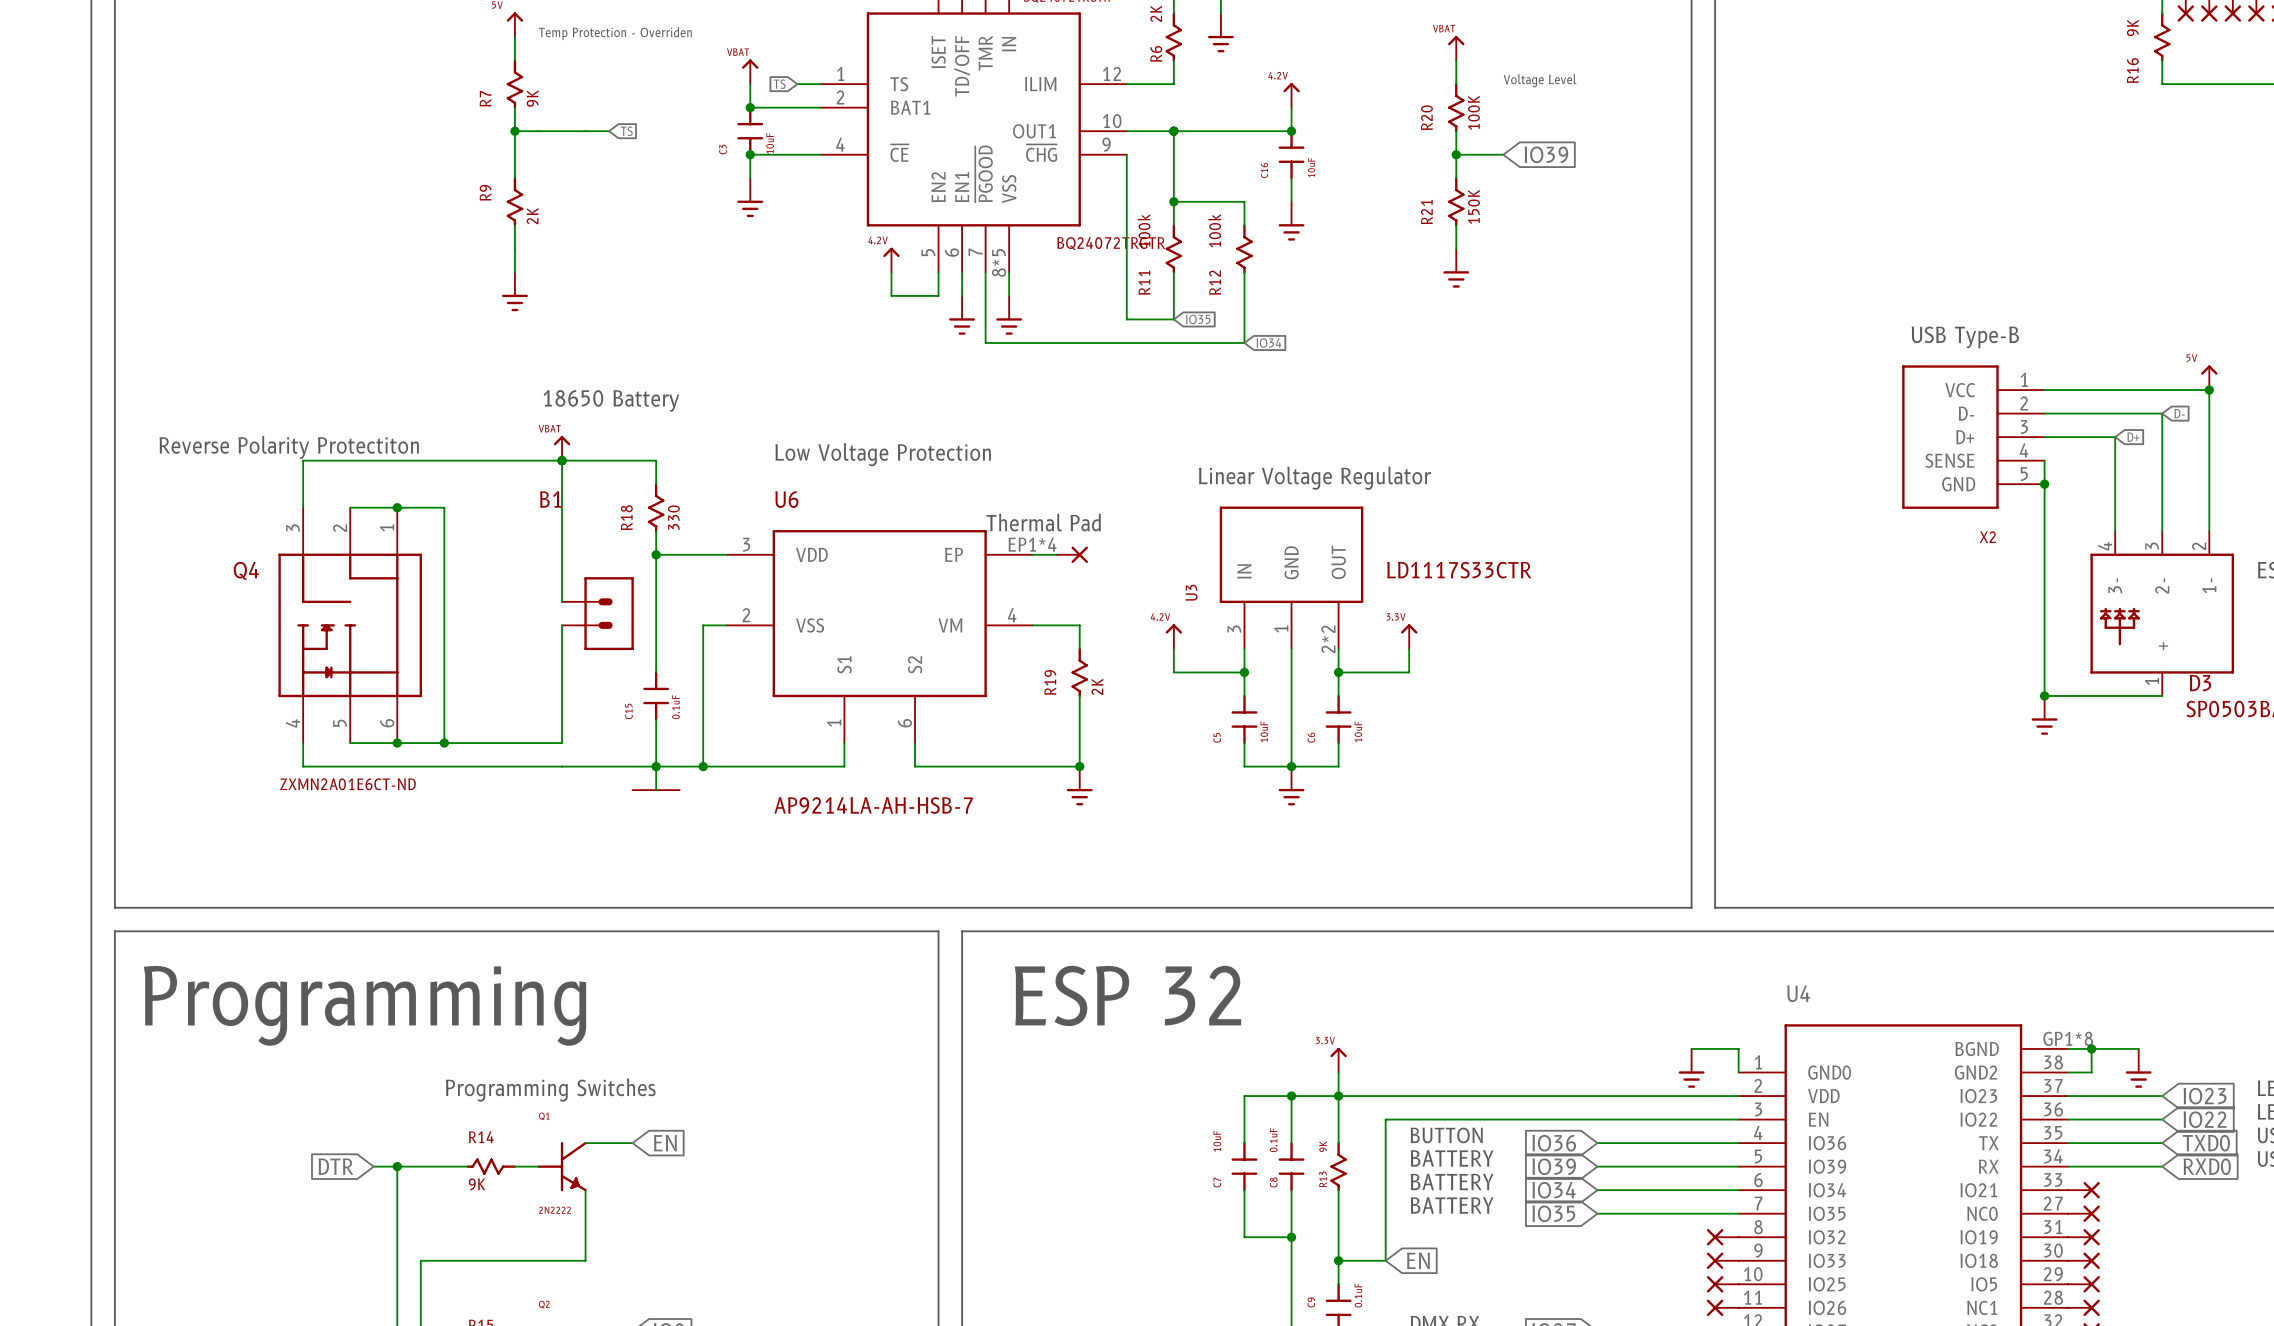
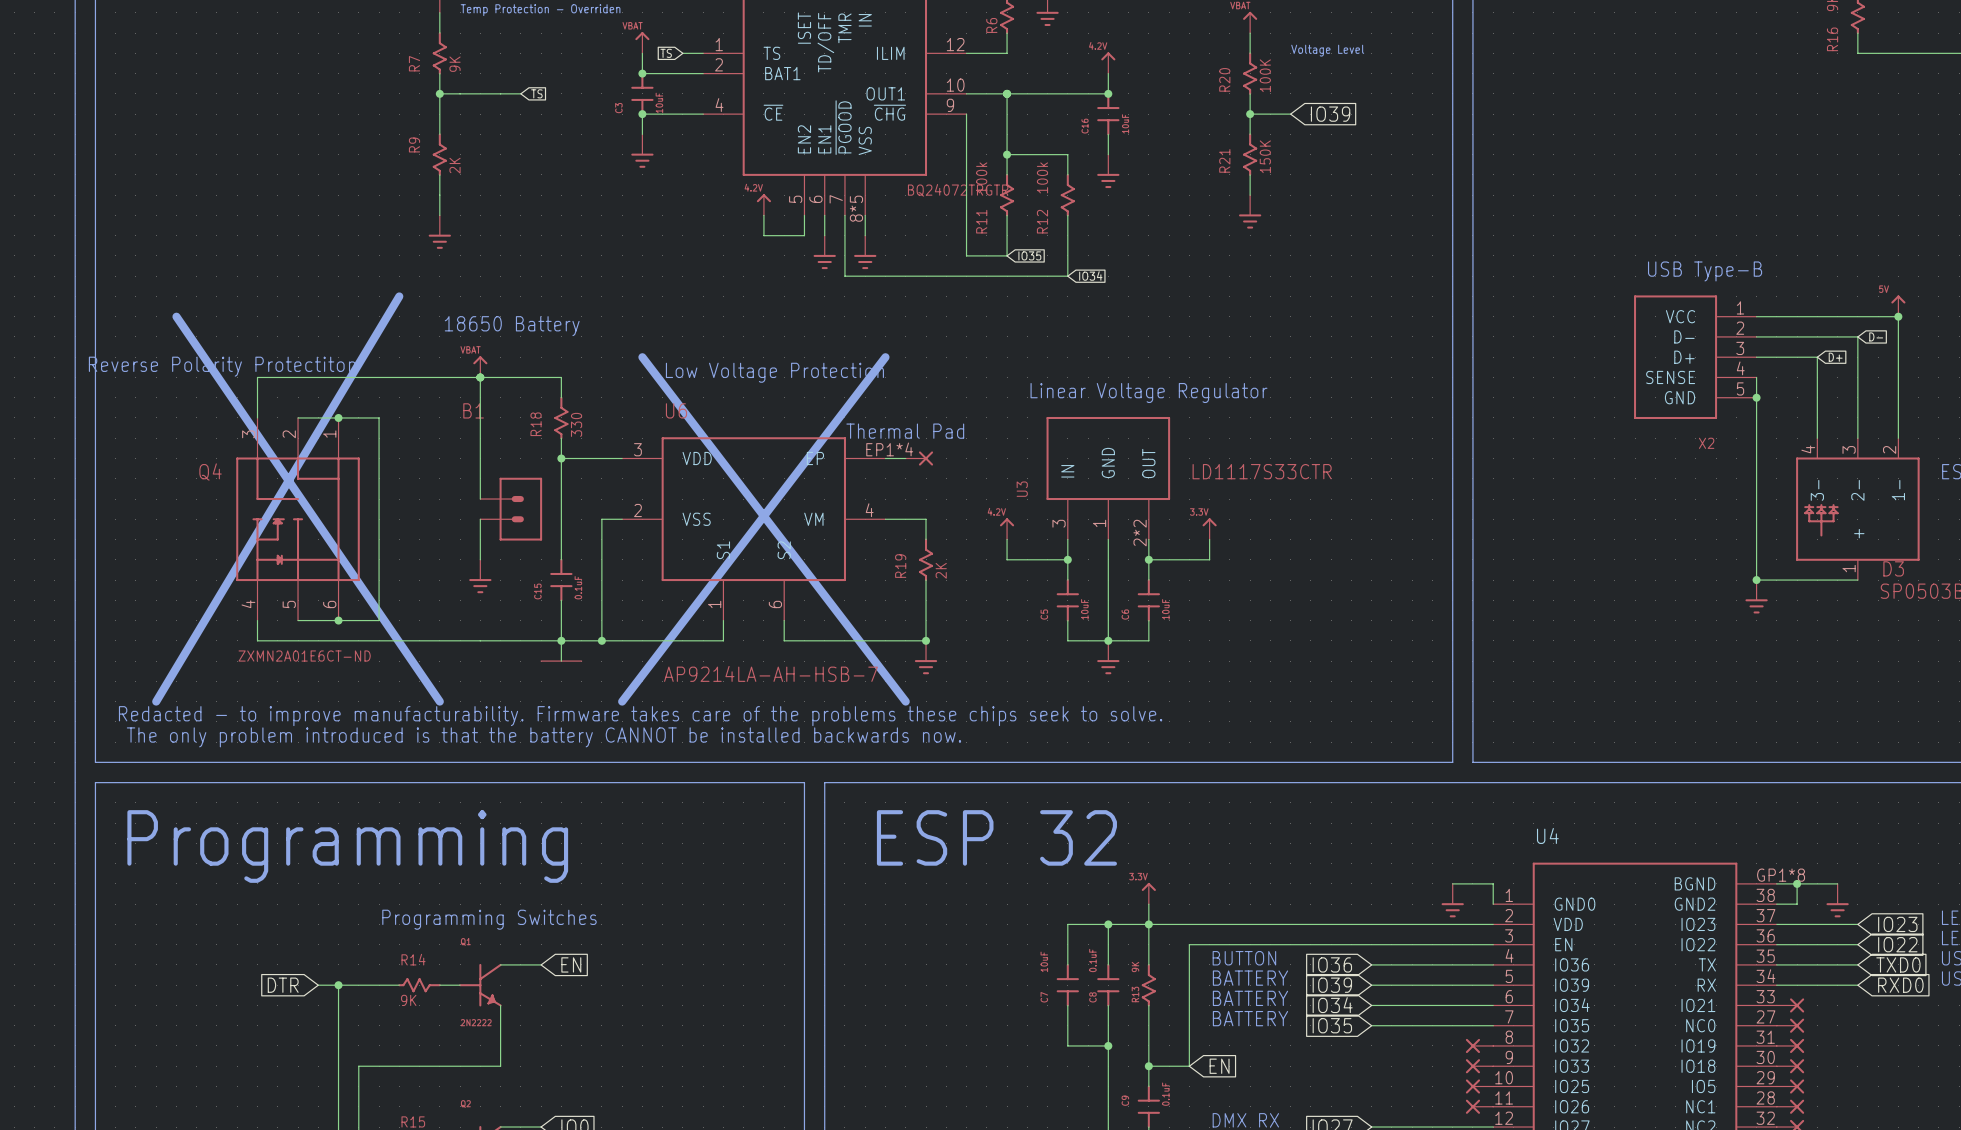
line: none -> (399, 296) (156, 701)
line: none -> (176, 316) (439, 701)
line: none -> (642, 357) (905, 701)
line: none -> (885, 357) (622, 701)
wire: (562, 672) (562, 743) (444, 743) -> none
part: none -> (480, 576)
junction: (444, 743) -> none
text: none -> Redacted - to improve manufacturability. Firmware takes care of the problems these chips seek to solve. (640, 716)
text: none -> The only problem introduced is that the battery CANNOT be installed backwards now. (543, 737)

